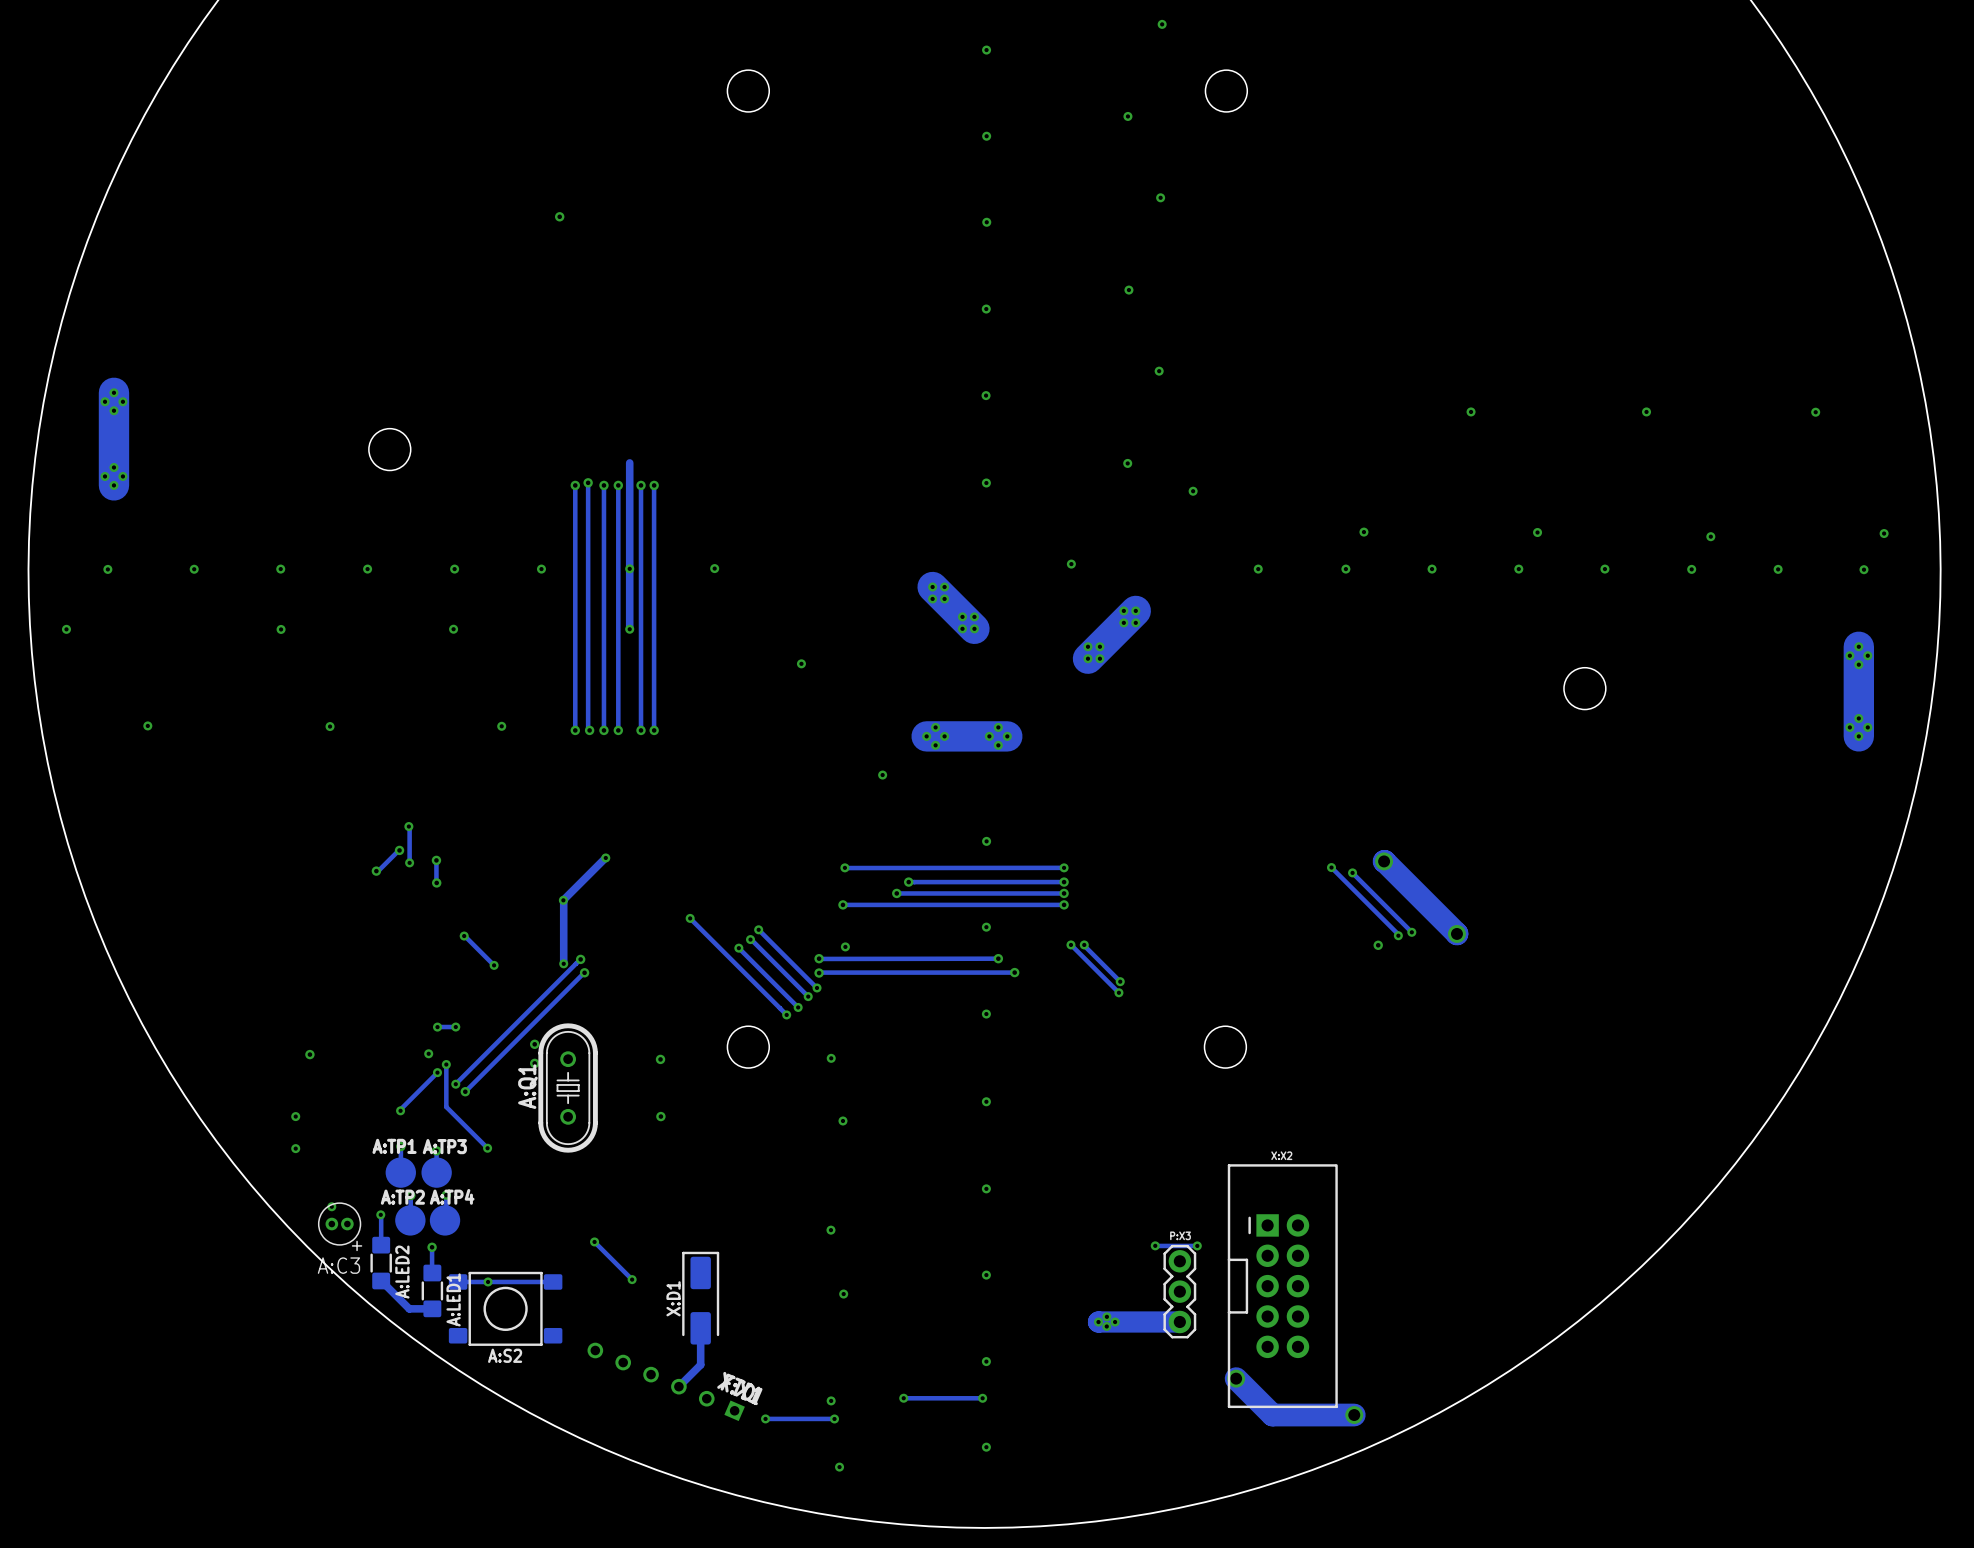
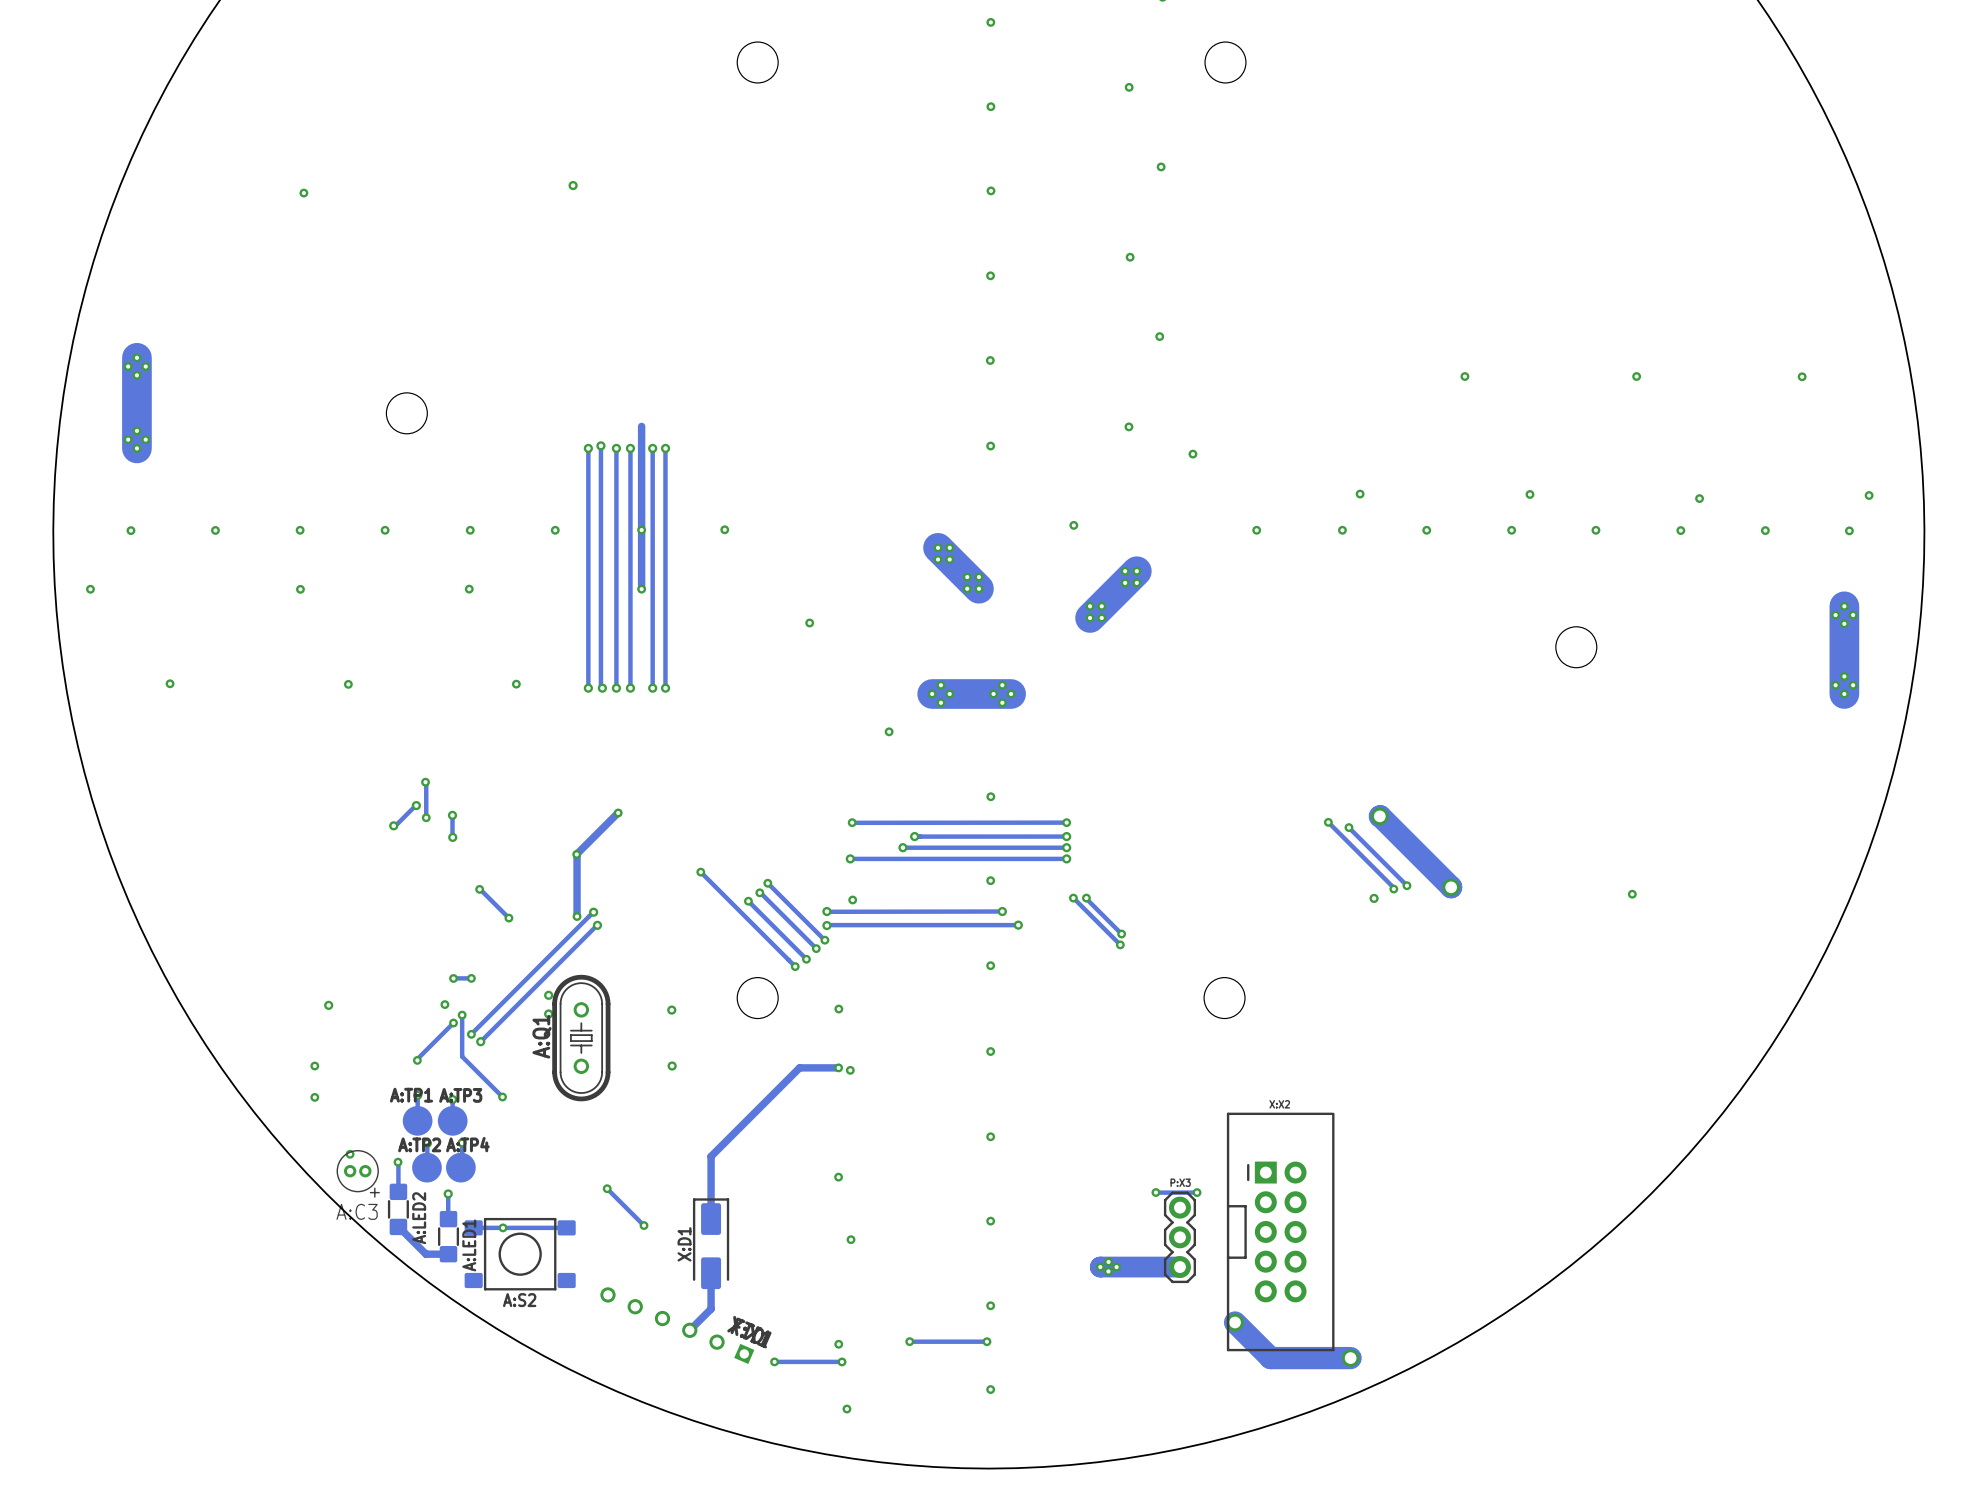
via: none -> (303, 193)
via: none -> (1632, 894)
track: none -> (838, 1067) (799, 1067) (711, 1156) (711, 1219)
via: none -> (838, 1067)

